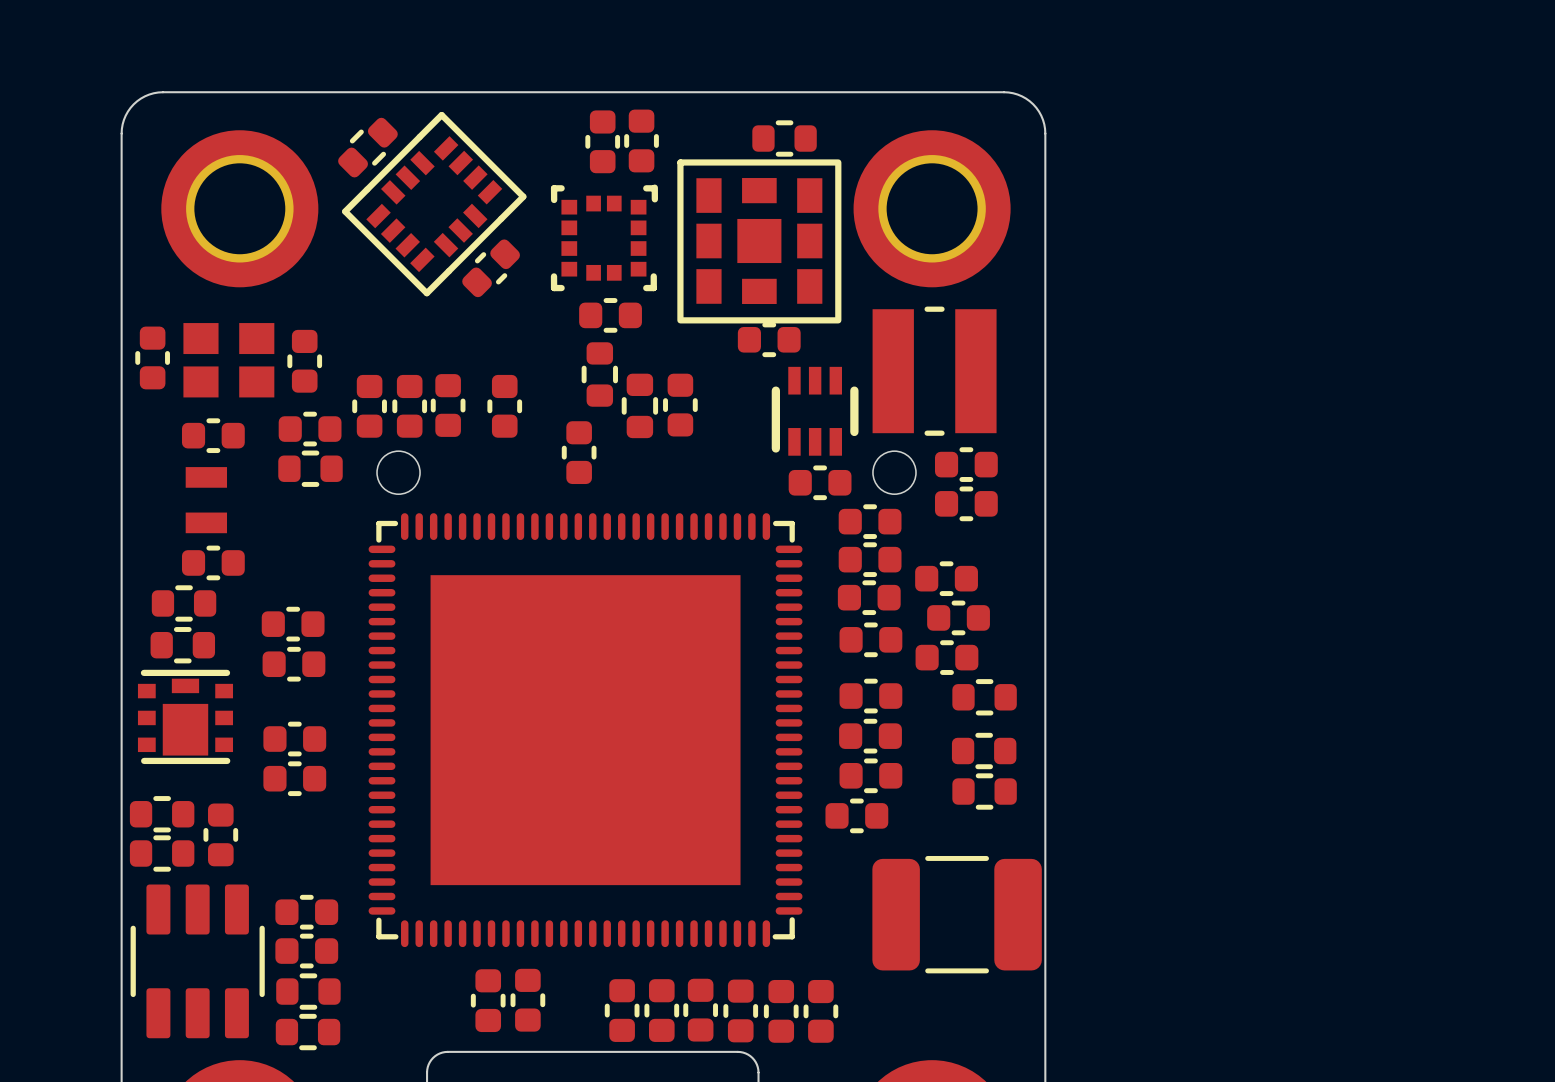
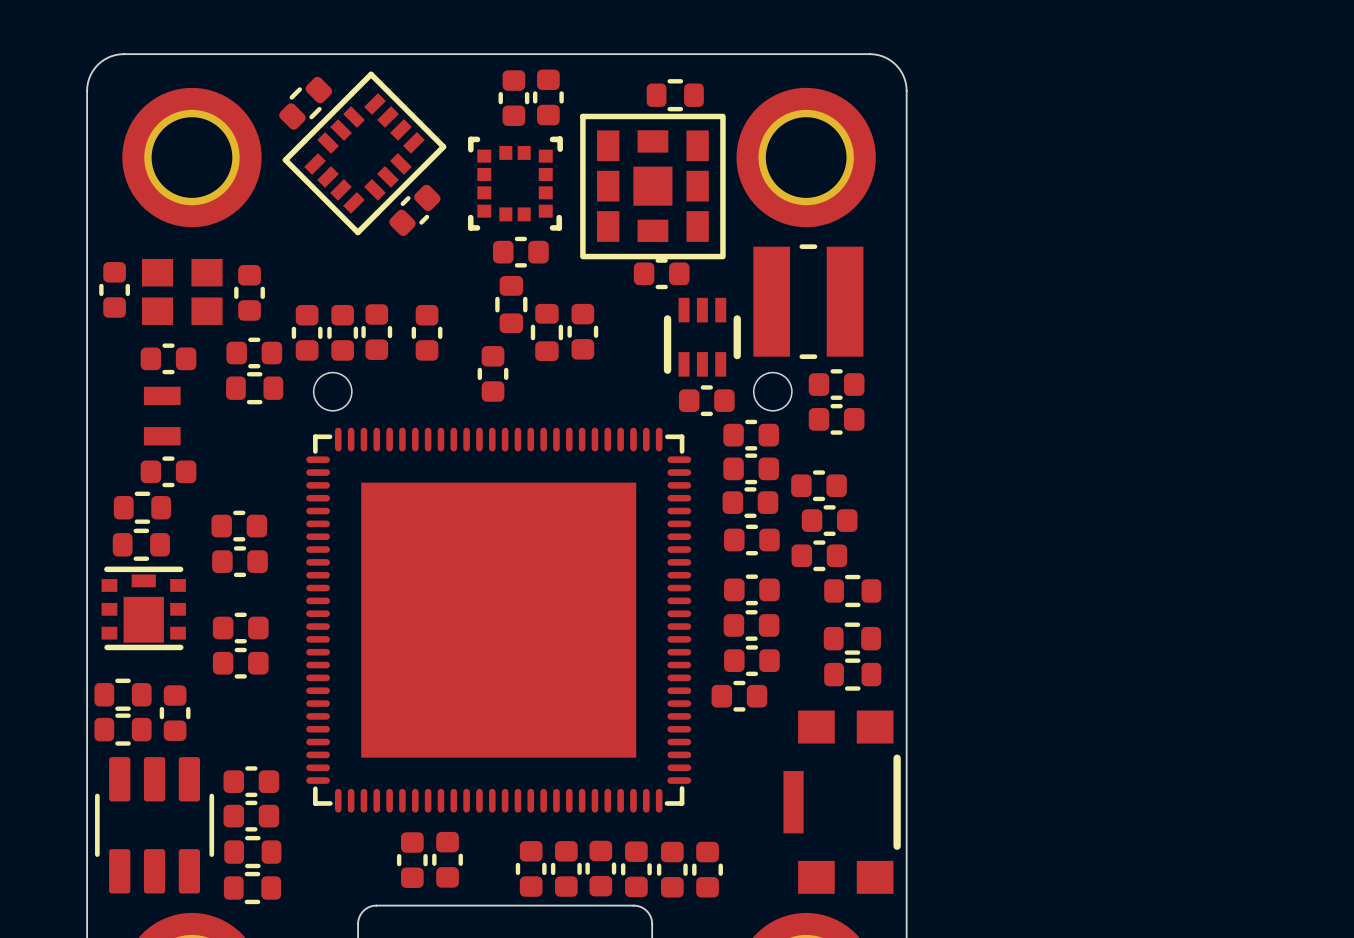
part footprint: [872, 855, 1042, 974] -> [783, 710, 901, 894]

